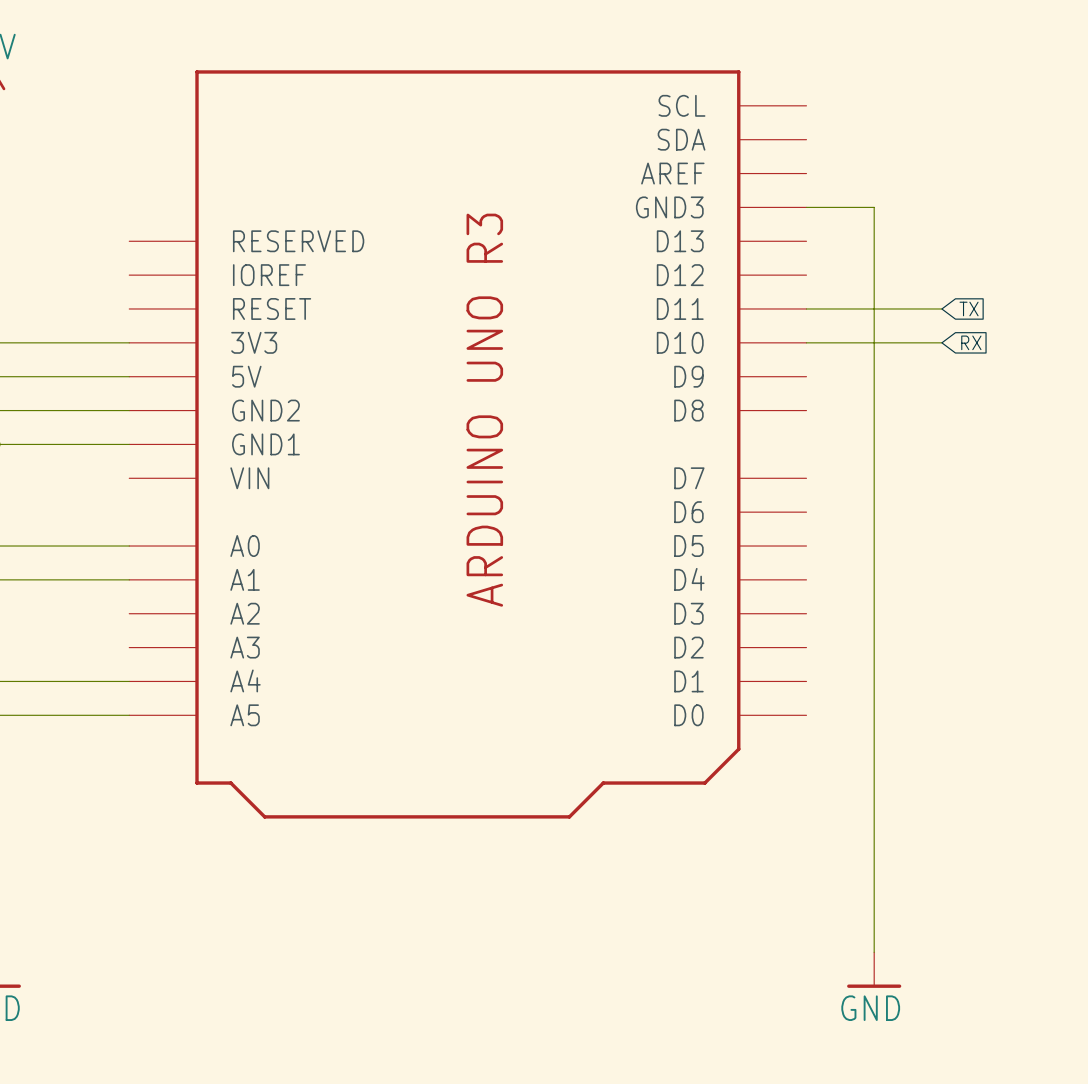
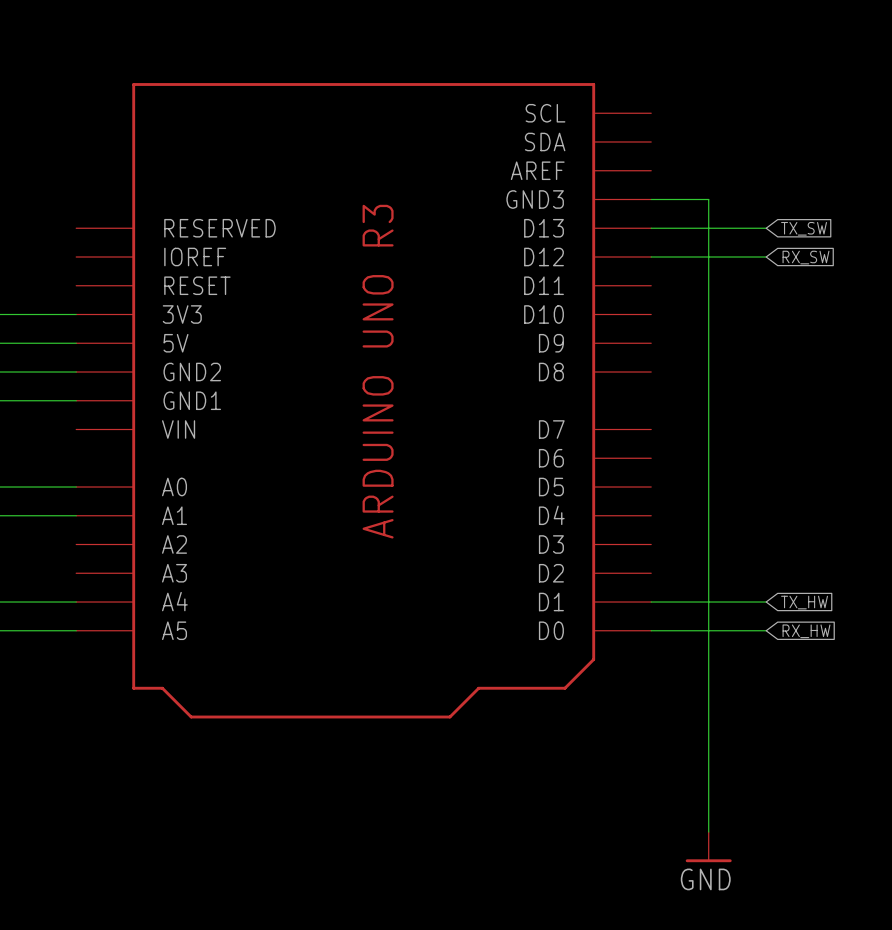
global label: none -> TX_SW (804, 228)
global label: none -> RX_SW (805, 257)
wire: (806, 308) (941, 308) -> (651, 228) (766, 228)
global label: TX (969, 308) -> none
wire: (806, 342) (941, 342) -> (651, 257) (766, 257)
global label: RX (971, 342) -> none
wire: none -> (651, 602) (766, 602)
global label: none -> TX_HW (804, 602)
wire: none -> (651, 630) (766, 630)
global label: none -> RX_HW (806, 631)

